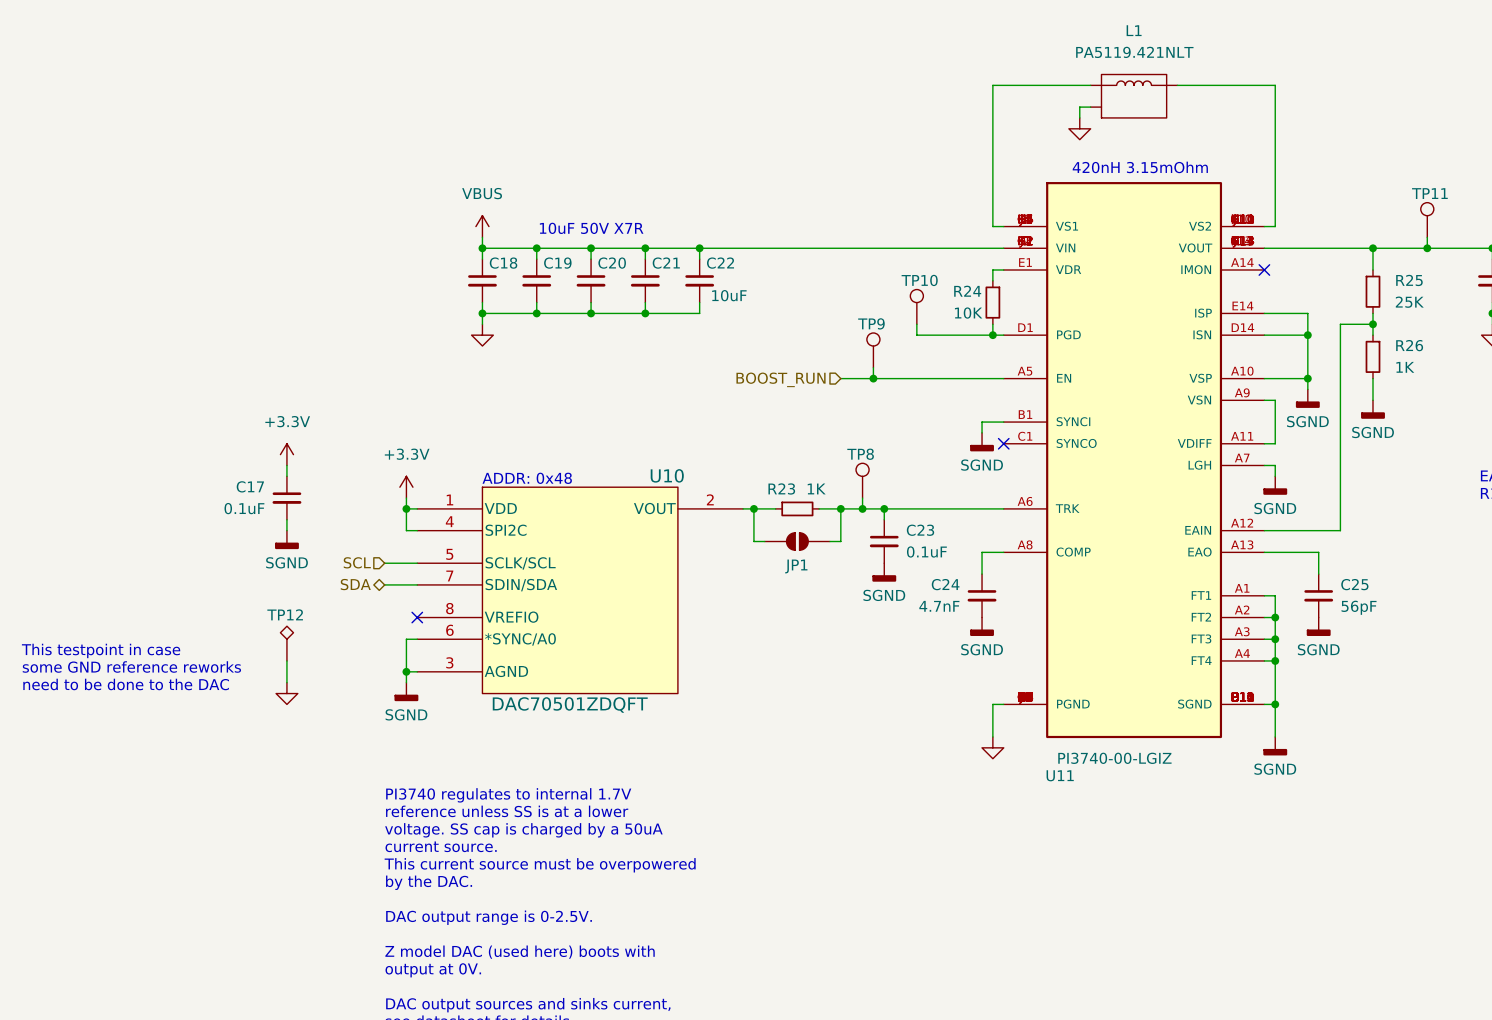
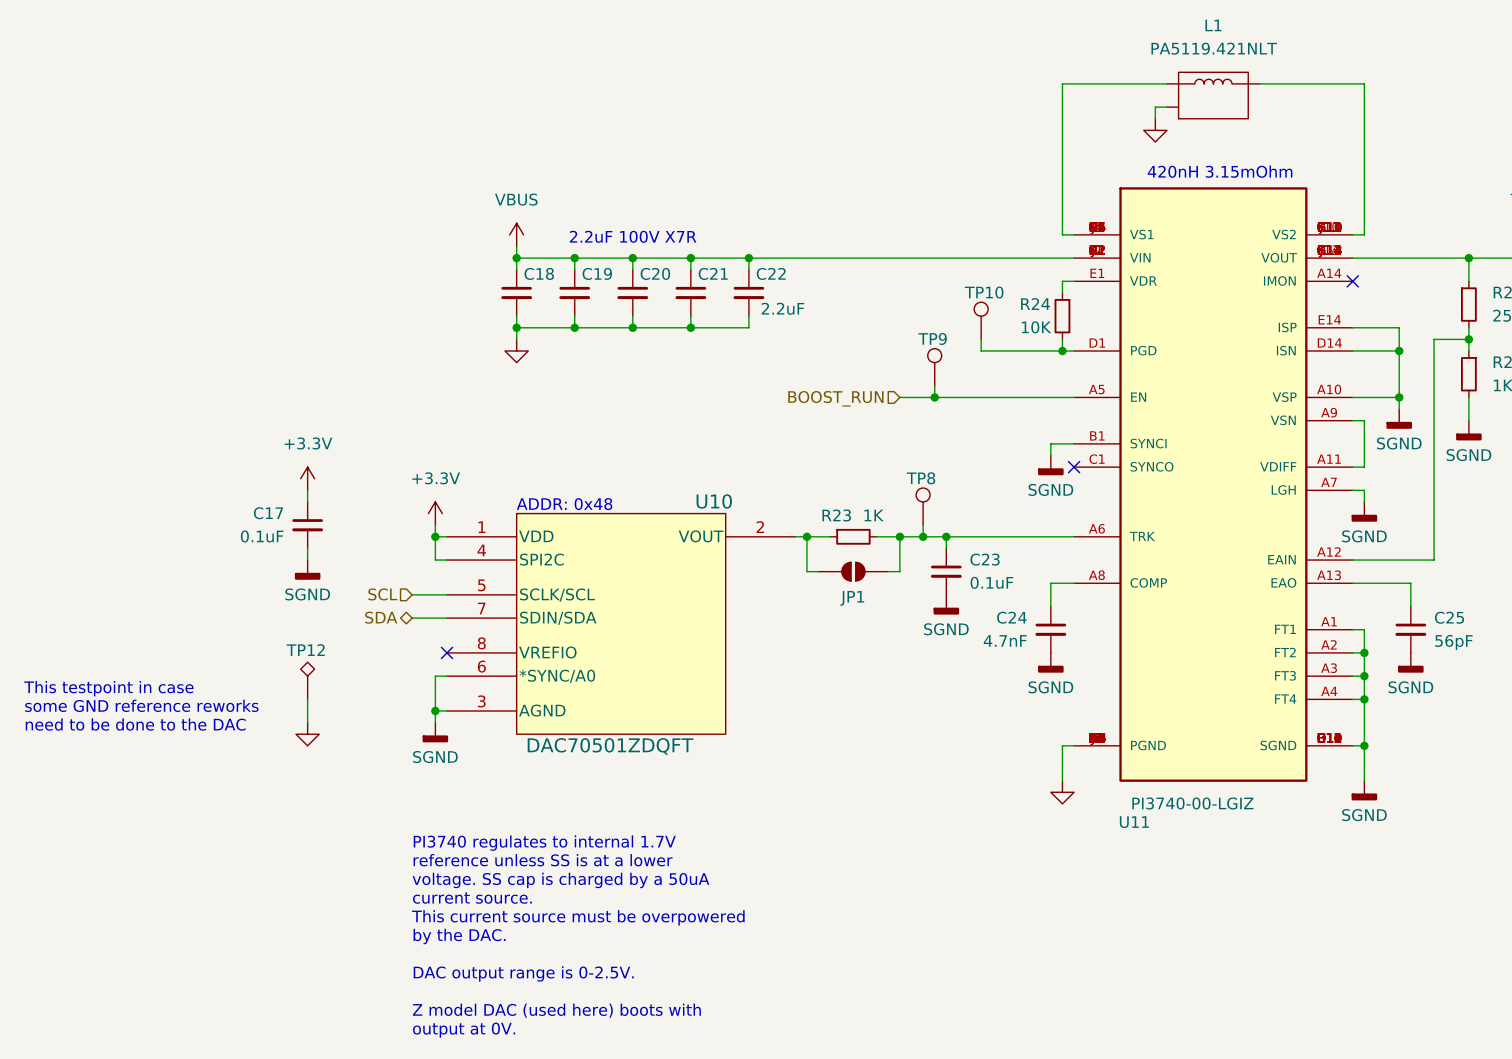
text: 10uF 50V X7R (591, 228) -> 2.2uF 100V X7R (633, 236)
C22 value: 10uF (729, 295) -> 2.2uF (782, 308)

